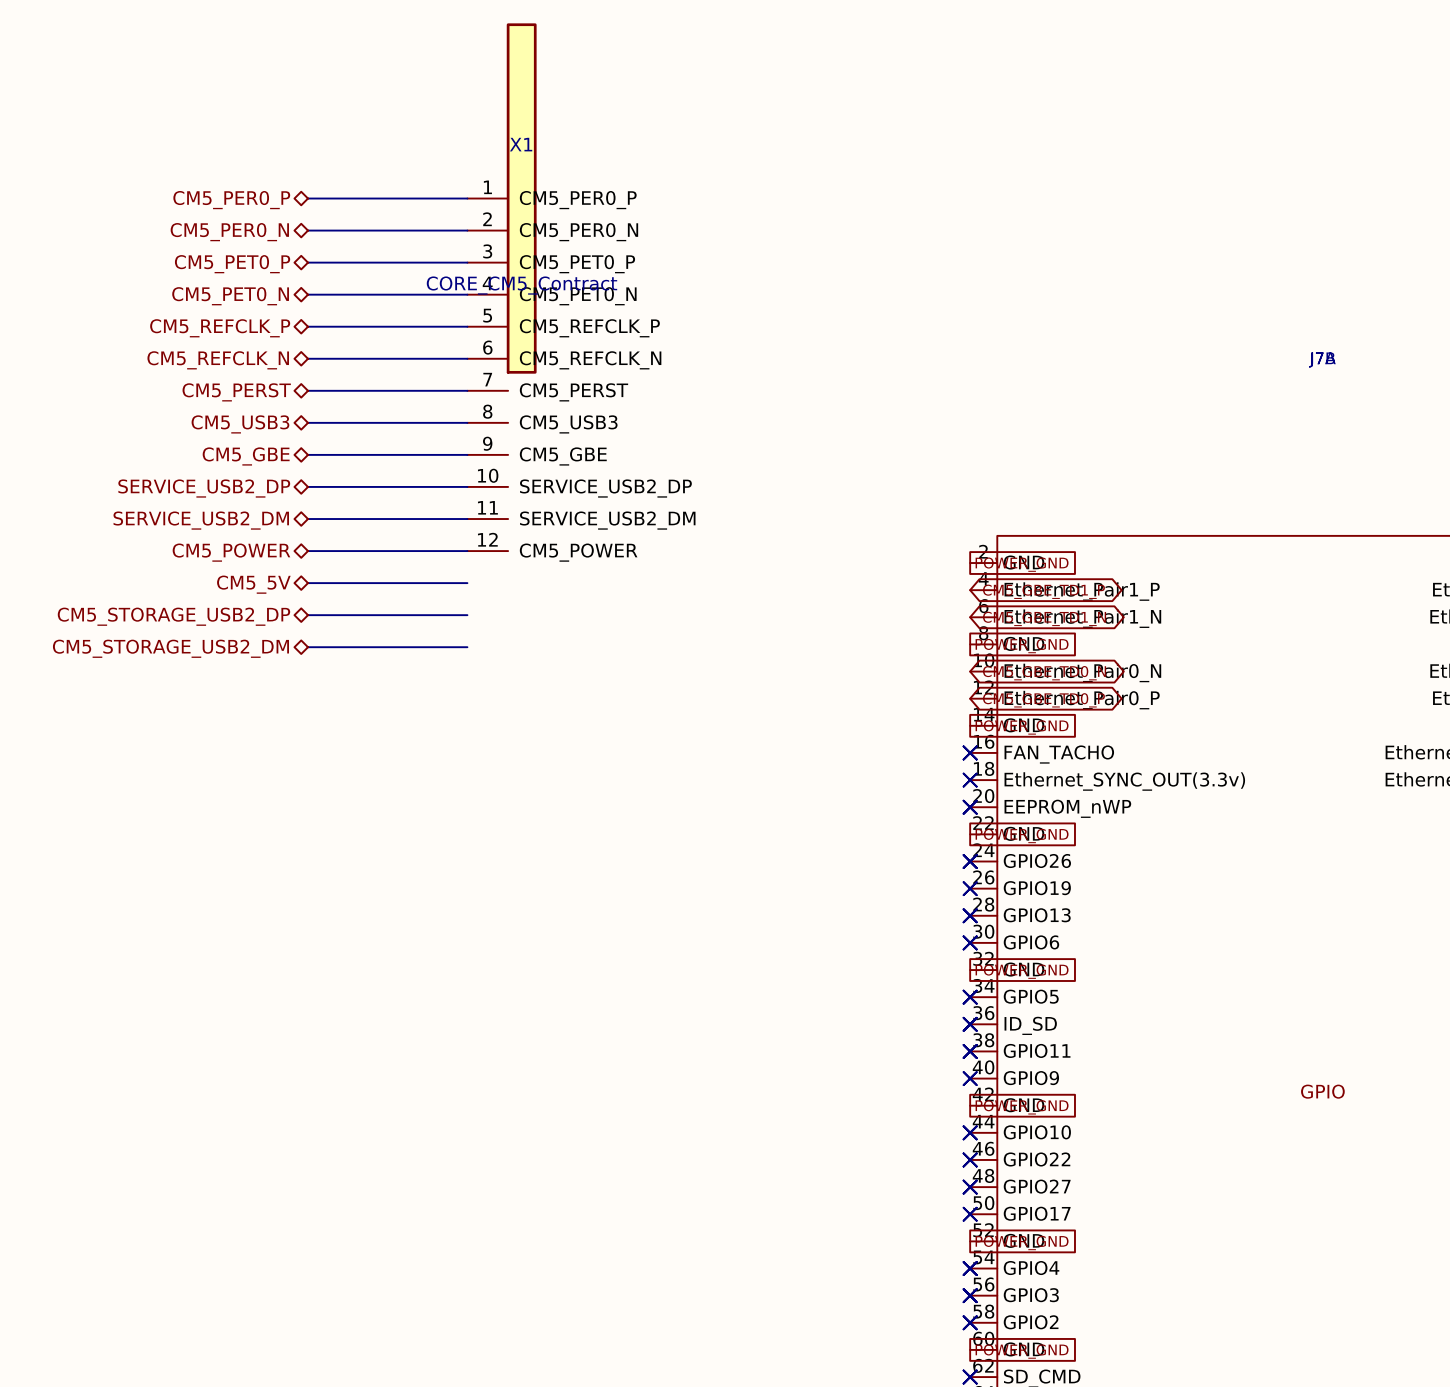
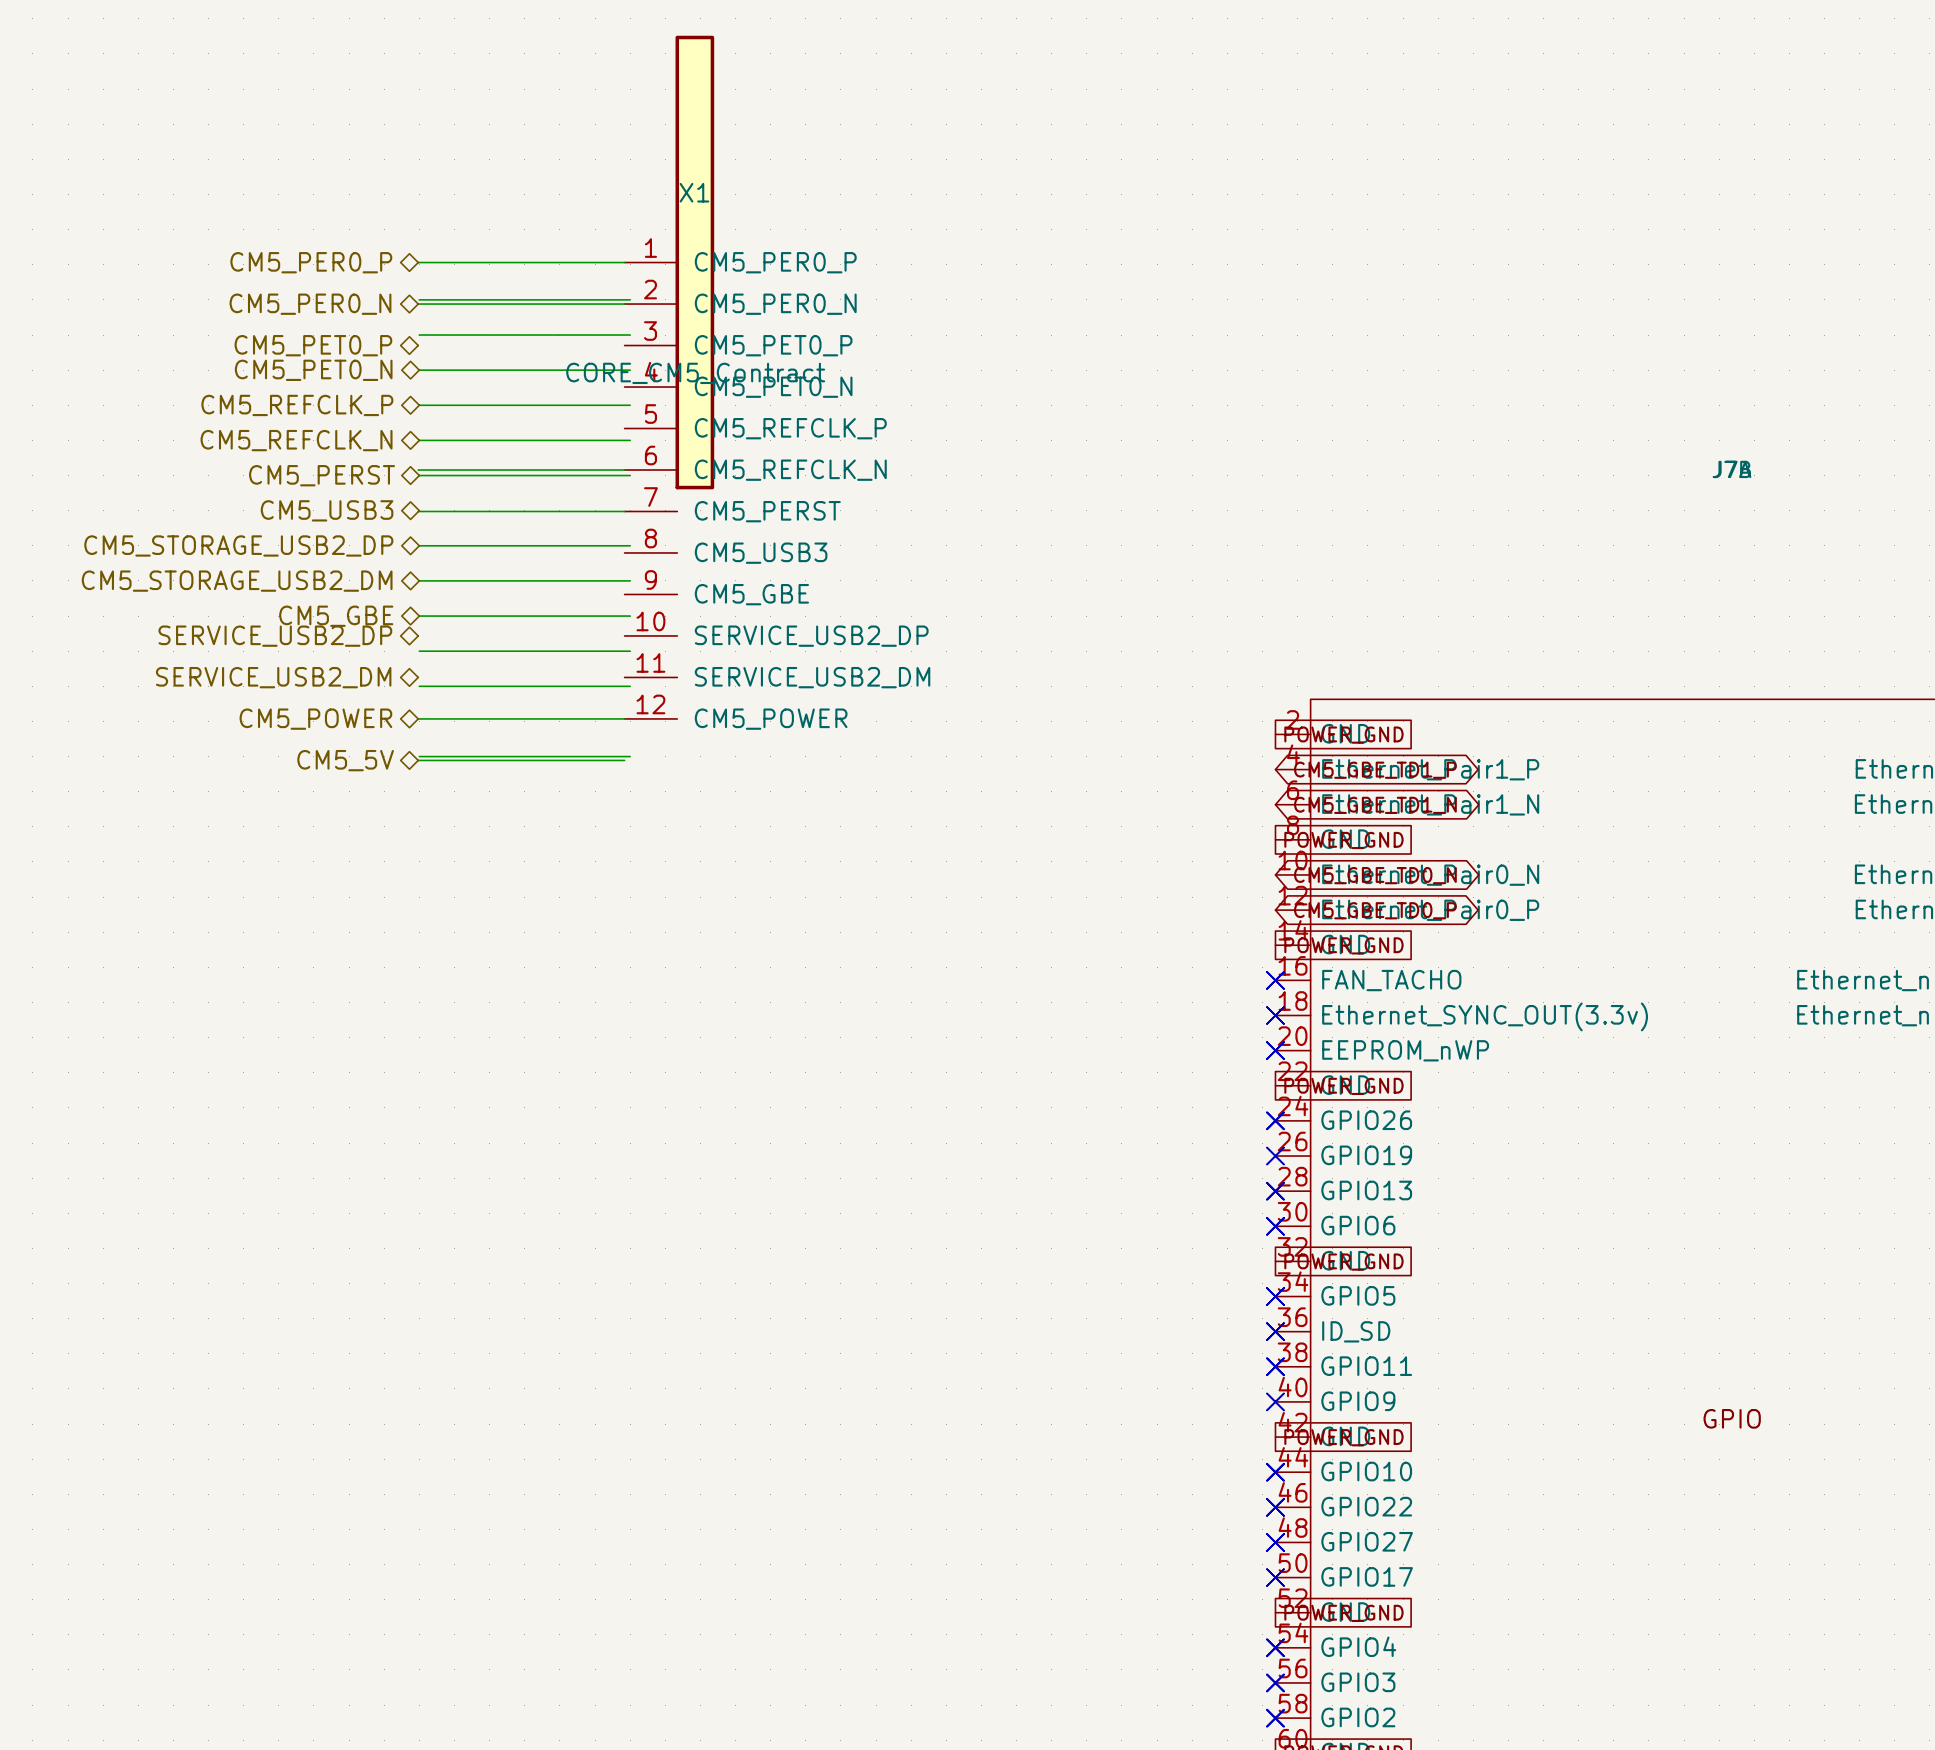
wire: none -> (419, 299) (630, 299)
wire: none -> (419, 335) (630, 335)
wire: (308, 262) (467, 262) -> none
wire: none -> (419, 370) (630, 370)
wire: (308, 294) (467, 294) -> none
hierarchical label position: CM5_PET0_N (230, 296) -> CM5_PET0_N (313, 370)
wire: none -> (419, 405) (630, 405)
wire: (308, 326) (467, 326) -> none
hierarchical label position: CM5_REFCLK_P (220, 328) -> CM5_REFCLK_P (297, 405)
wire: none -> (419, 440) (630, 440)
hierarchical label position: CM5_REFCLK_N (218, 360) -> CM5_REFCLK_N (296, 440)
wire: none -> (419, 475) (630, 475)
hierarchical label: none -> CM5_PERST (322, 475)
hierarchical label: CM5_PERST (236, 392) -> CM5_USB3 (327, 510)
wire: none -> (419, 545) (630, 545)
wire: (308, 422) (467, 422) -> none
hierarchical label: CM5_USB3 (240, 424) -> none
wire: none -> (419, 580) (630, 580)
wire: (308, 454) (467, 454) -> none
hierarchical label position: CM5_GBE (246, 456) -> CM5_GBE (336, 616)
wire: none -> (419, 616) (630, 616)
wire: (308, 486) (467, 486) -> none
wire: none -> (419, 651) (630, 651)
wire: (308, 519) (467, 519) -> none
wire: none -> (419, 686) (630, 686)
wire: none -> (419, 756) (630, 756)
wire: (308, 615) (467, 615) -> none
hierarchical label position: CM5_STORAGE_USB2_DP (173, 616) -> CM5_STORAGE_USB2_DP (238, 545)
wire: (308, 647) (467, 647) -> none
hierarchical label position: CM5_STORAGE_USB2_DM (170, 648) -> CM5_STORAGE_USB2_DM (237, 581)

